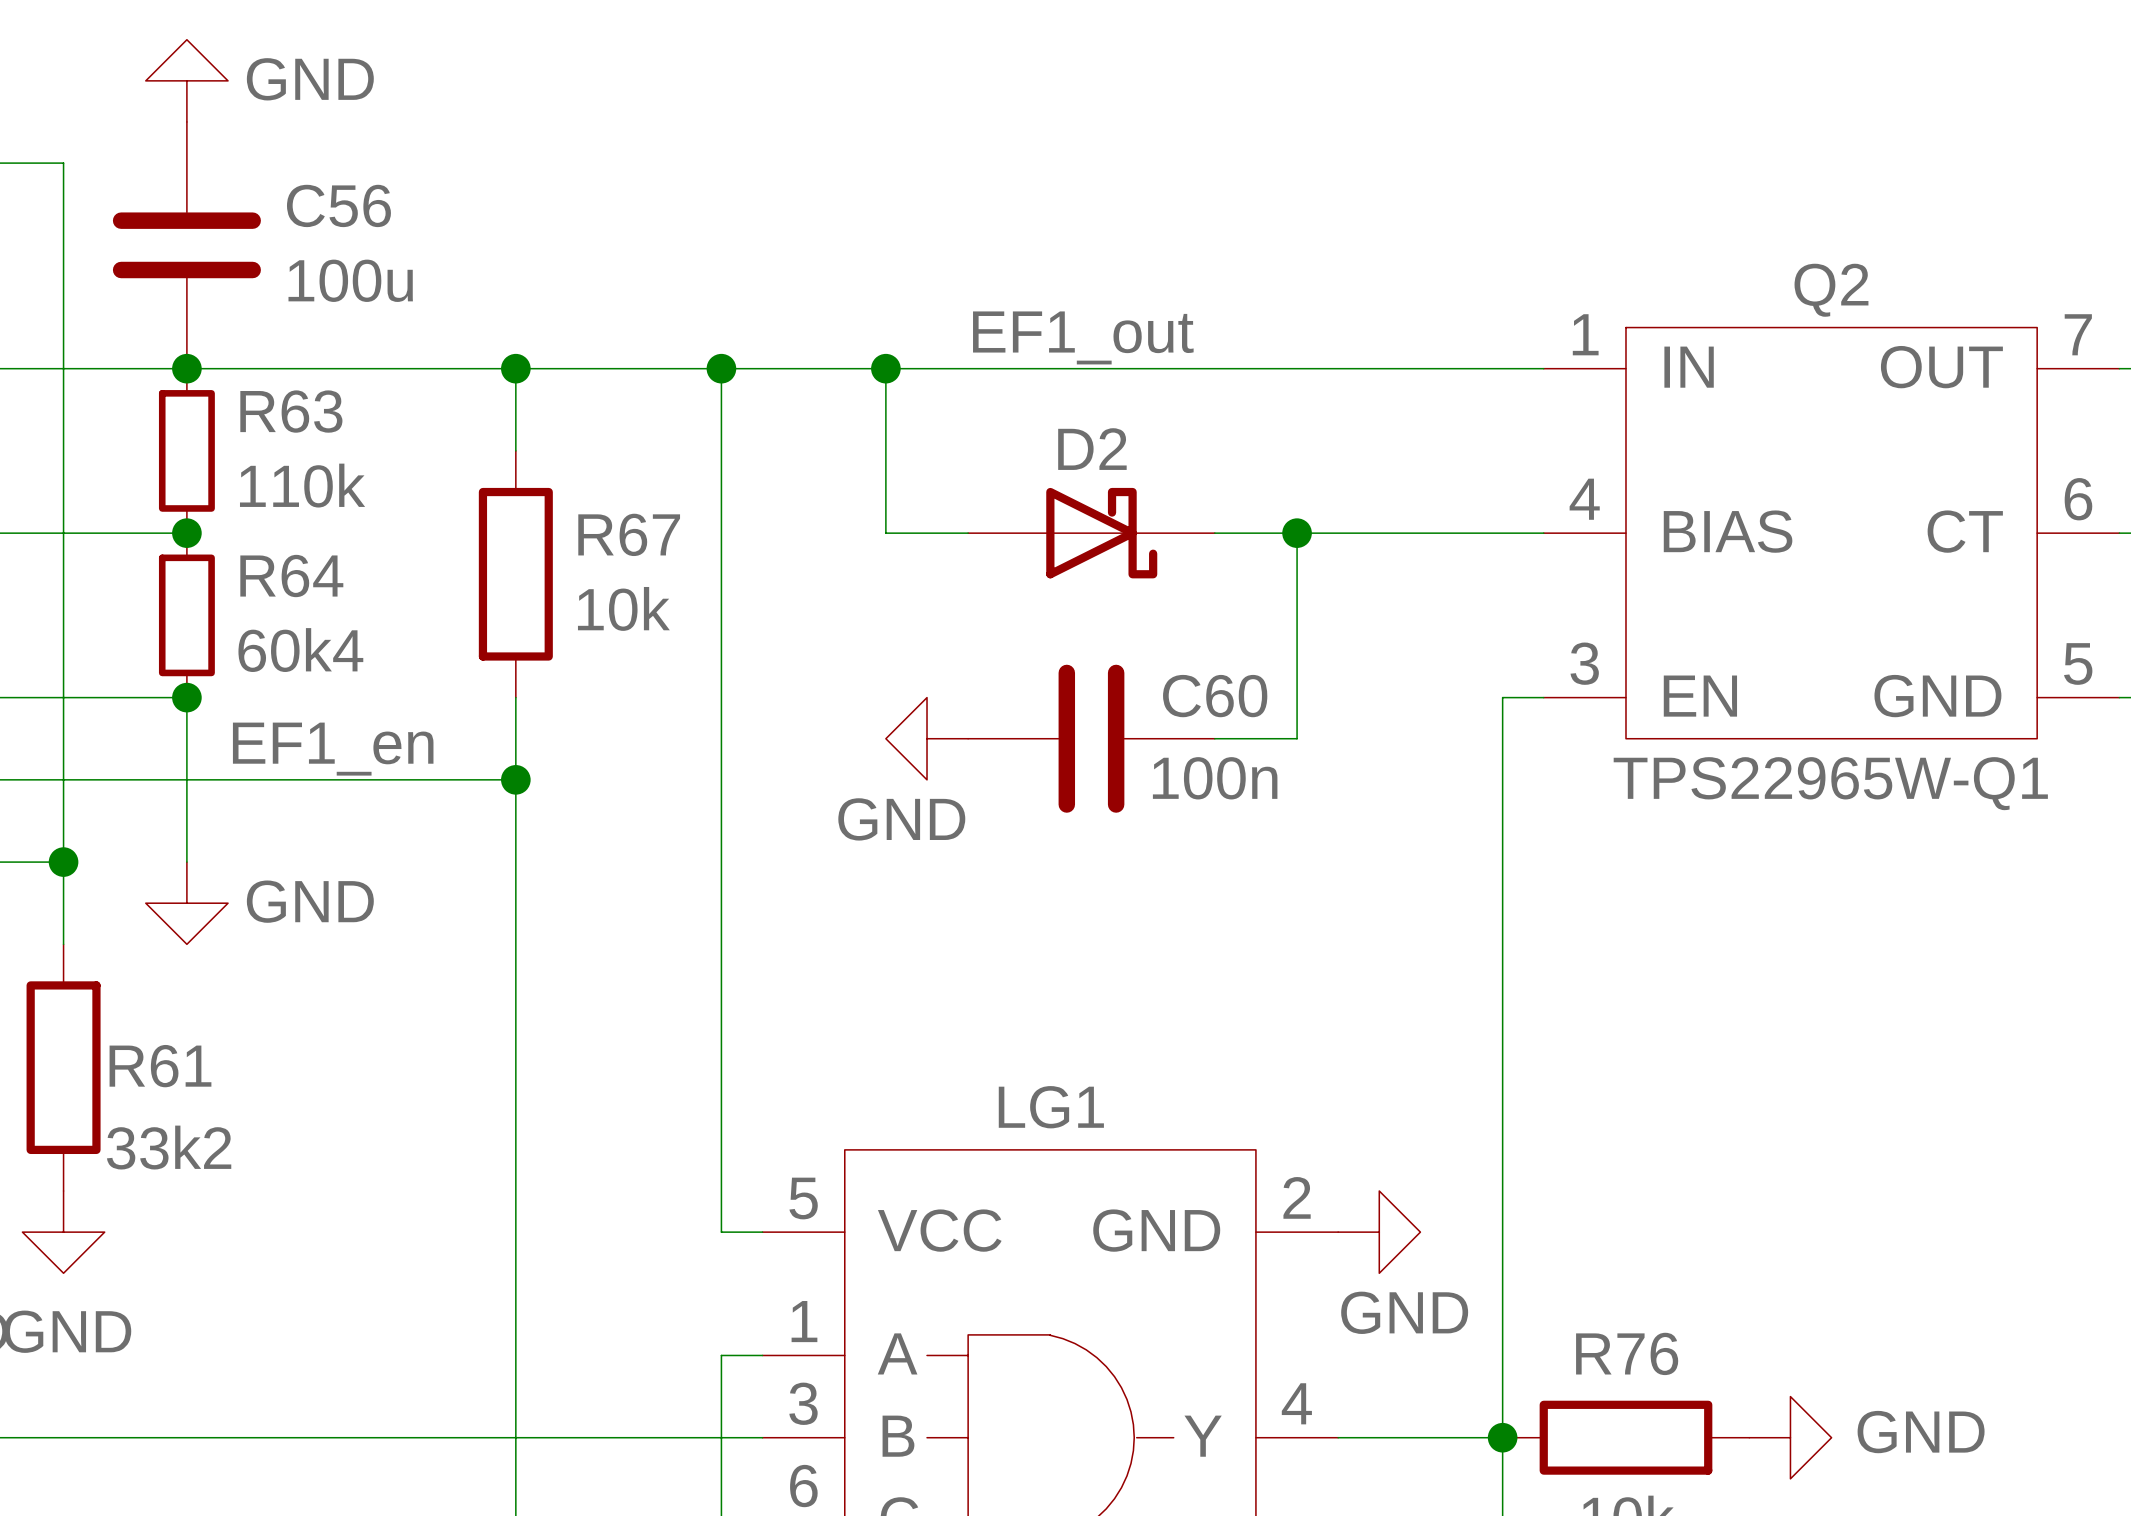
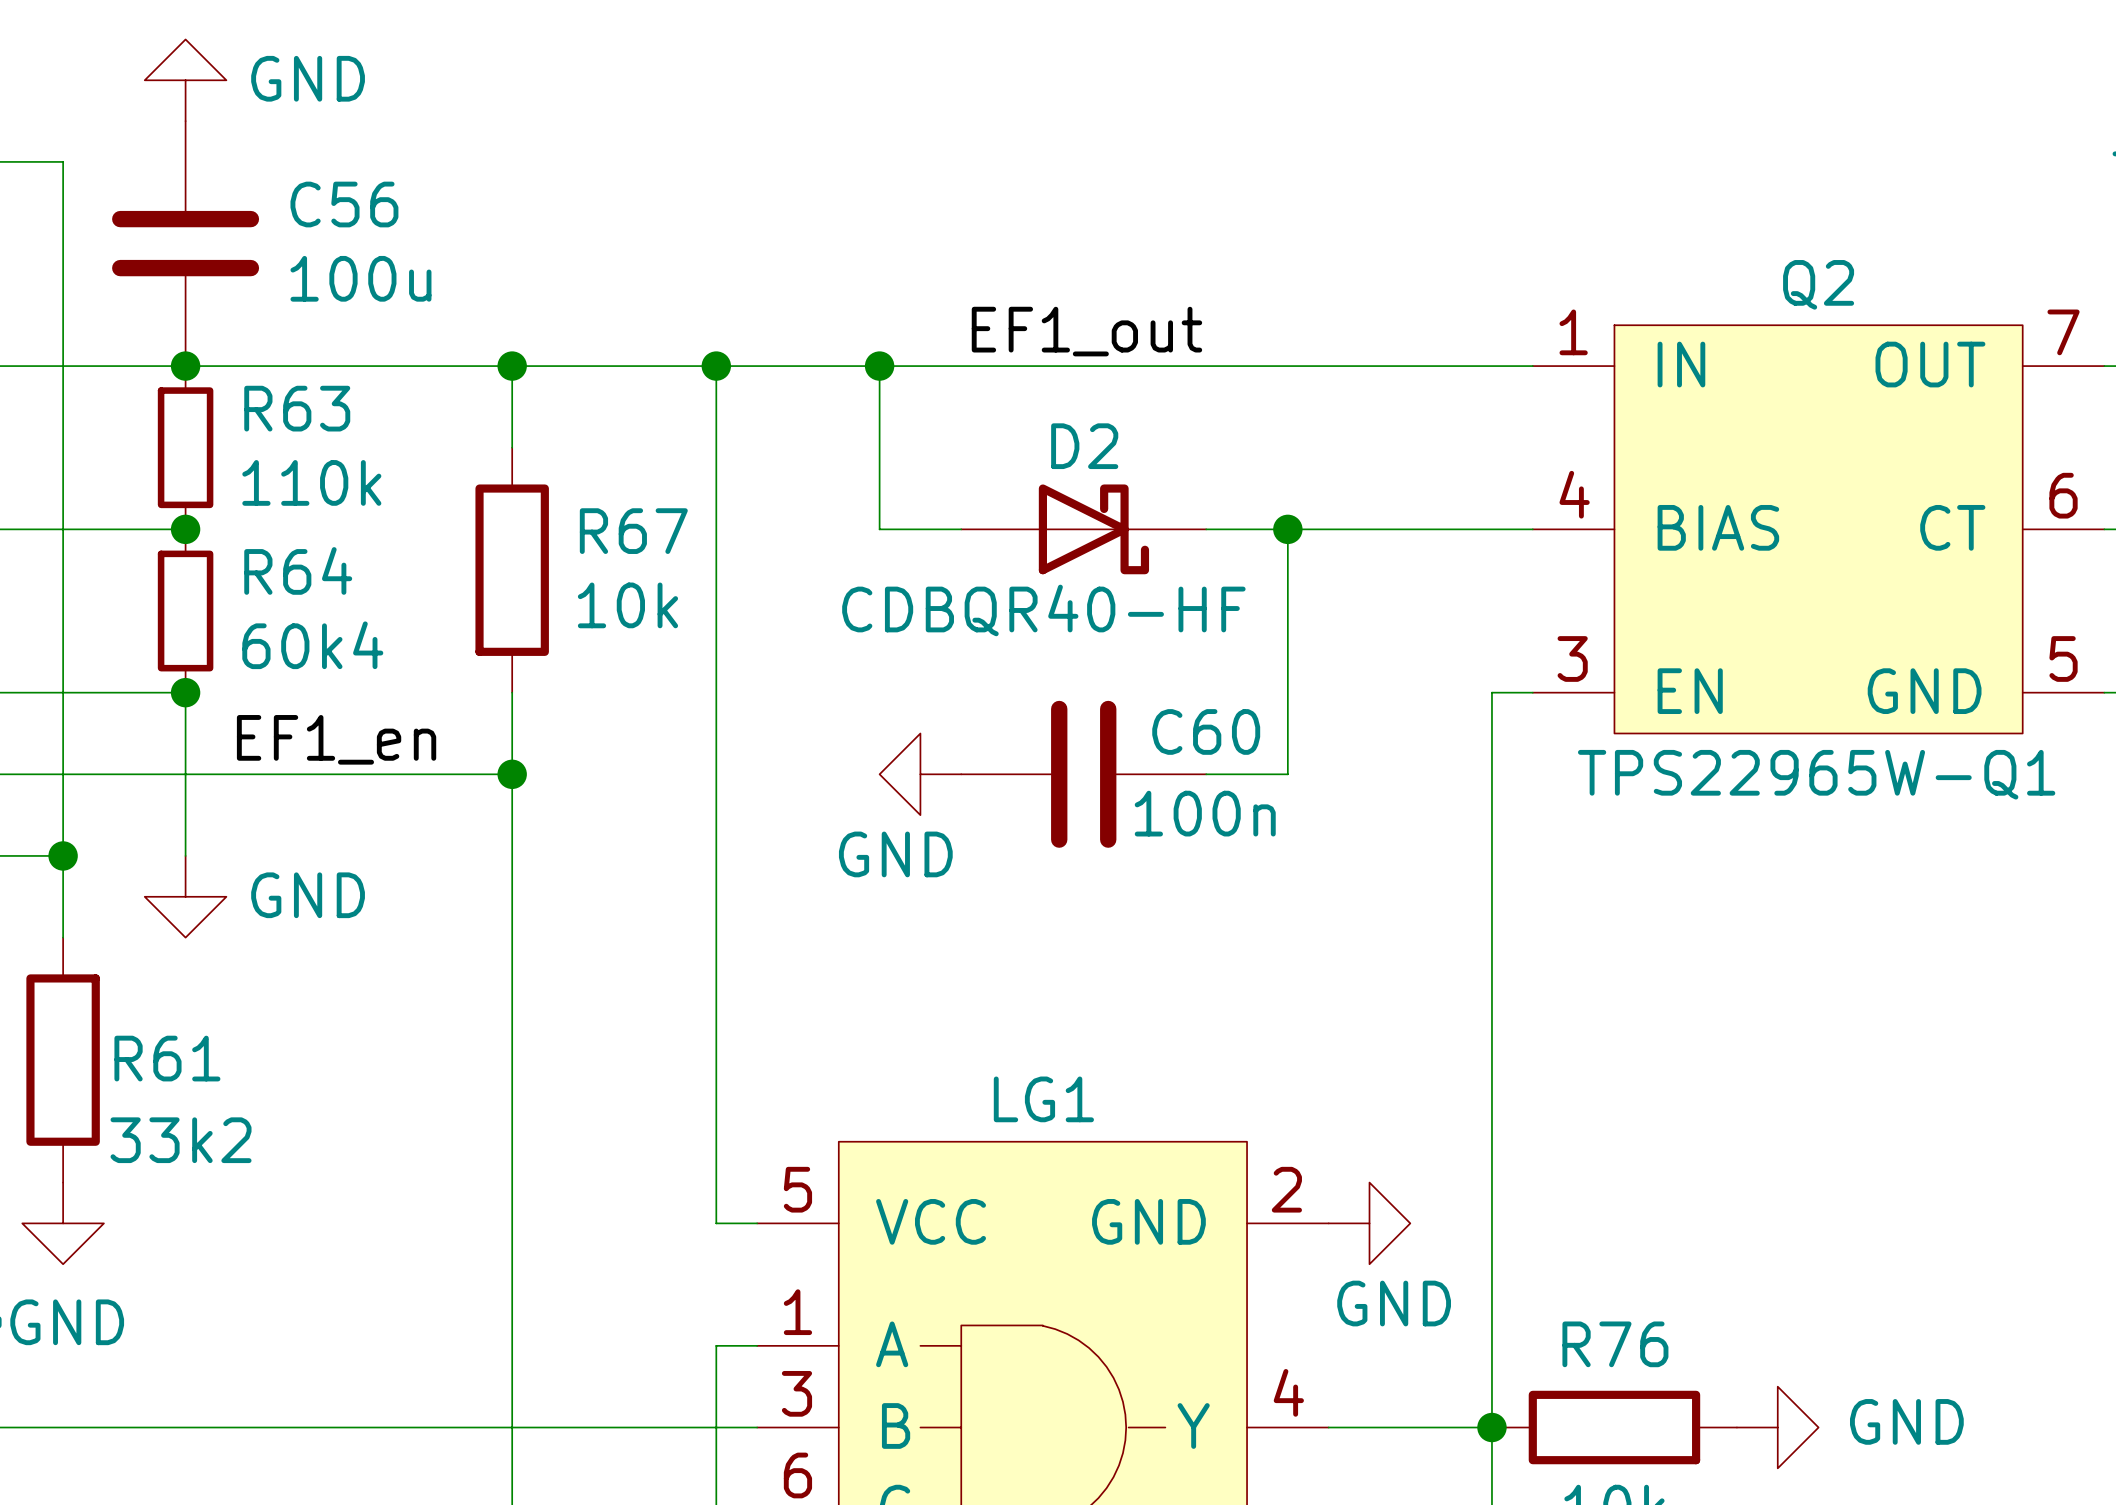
D2 value: none -> CDBQR40-HF (1043, 610)
power symbol position: GND (927, 738) -> GND (920, 774)
C60 position: (1091, 738) -> (1083, 774)
wire: (1214, 738) (1297, 738) -> (1206, 774) (1287, 774) (1287, 733)

